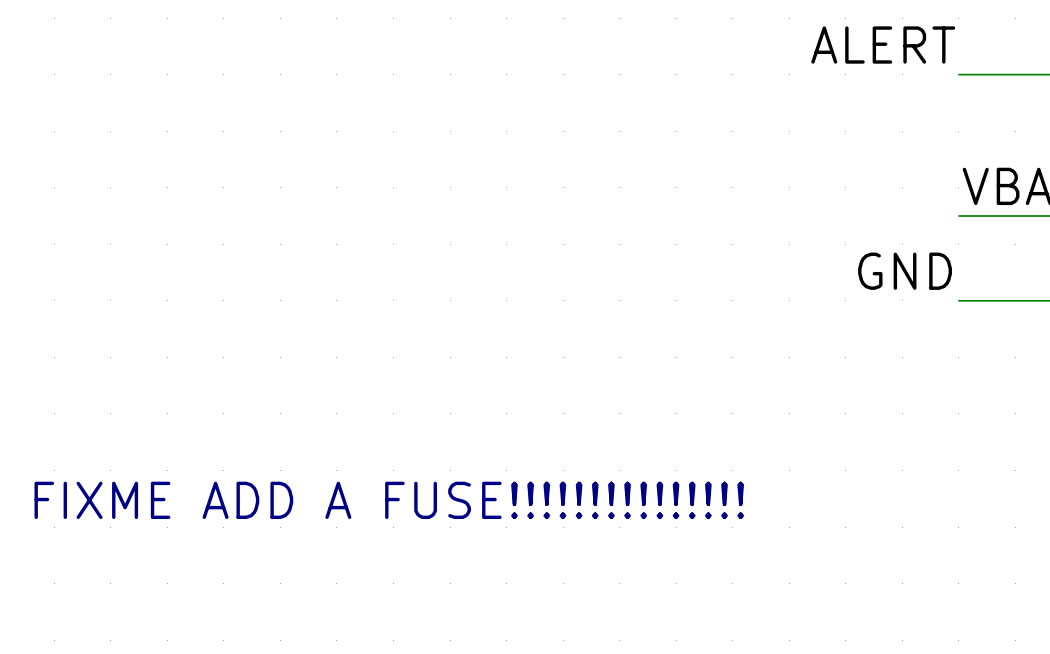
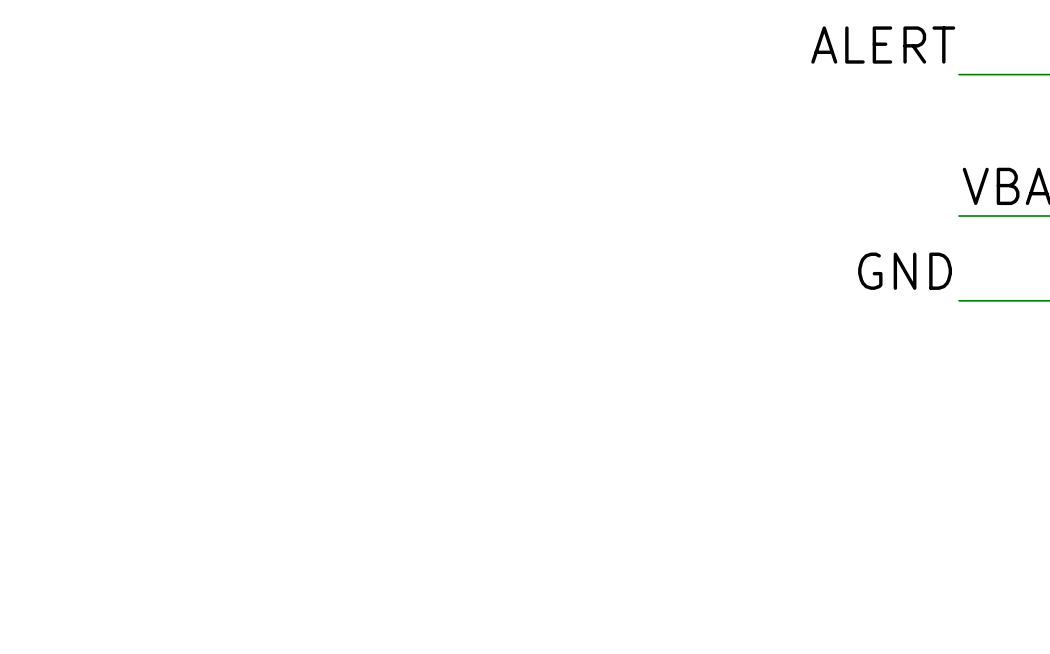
text: FIXME ADD A FUSE!!!!!!!!!!!!!!! (389, 500) -> none

